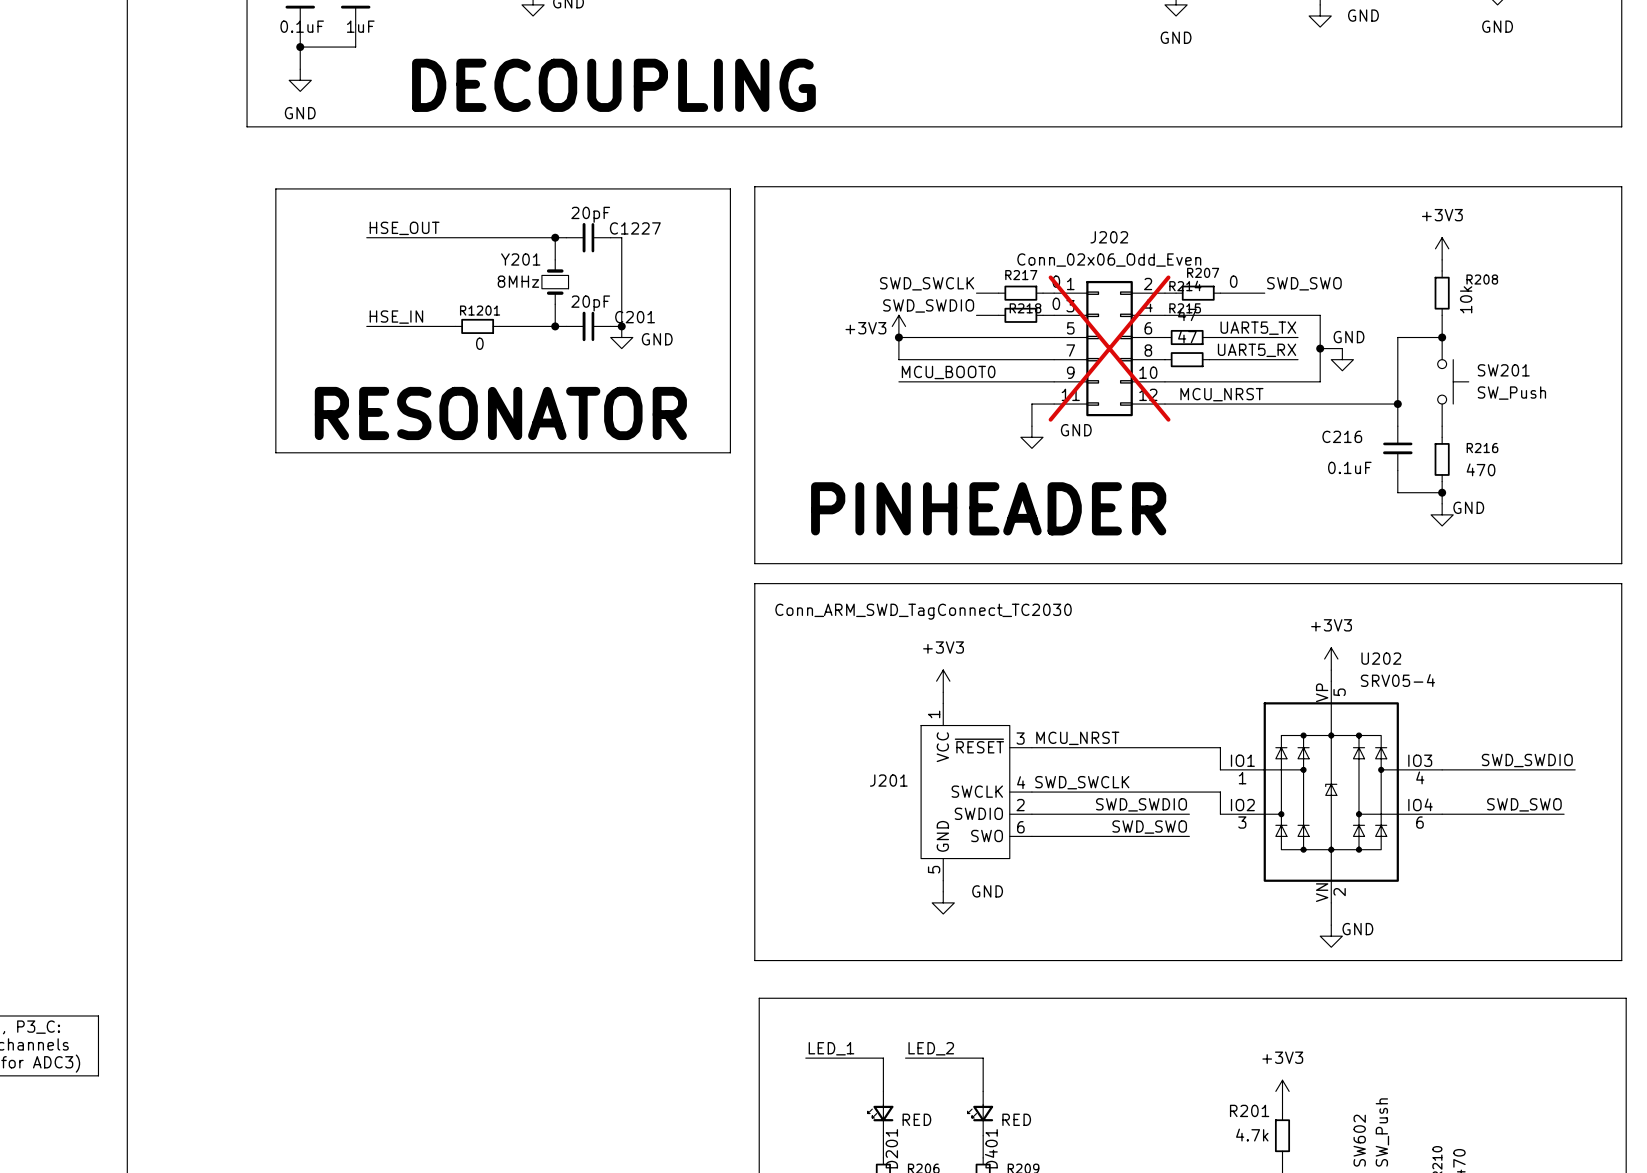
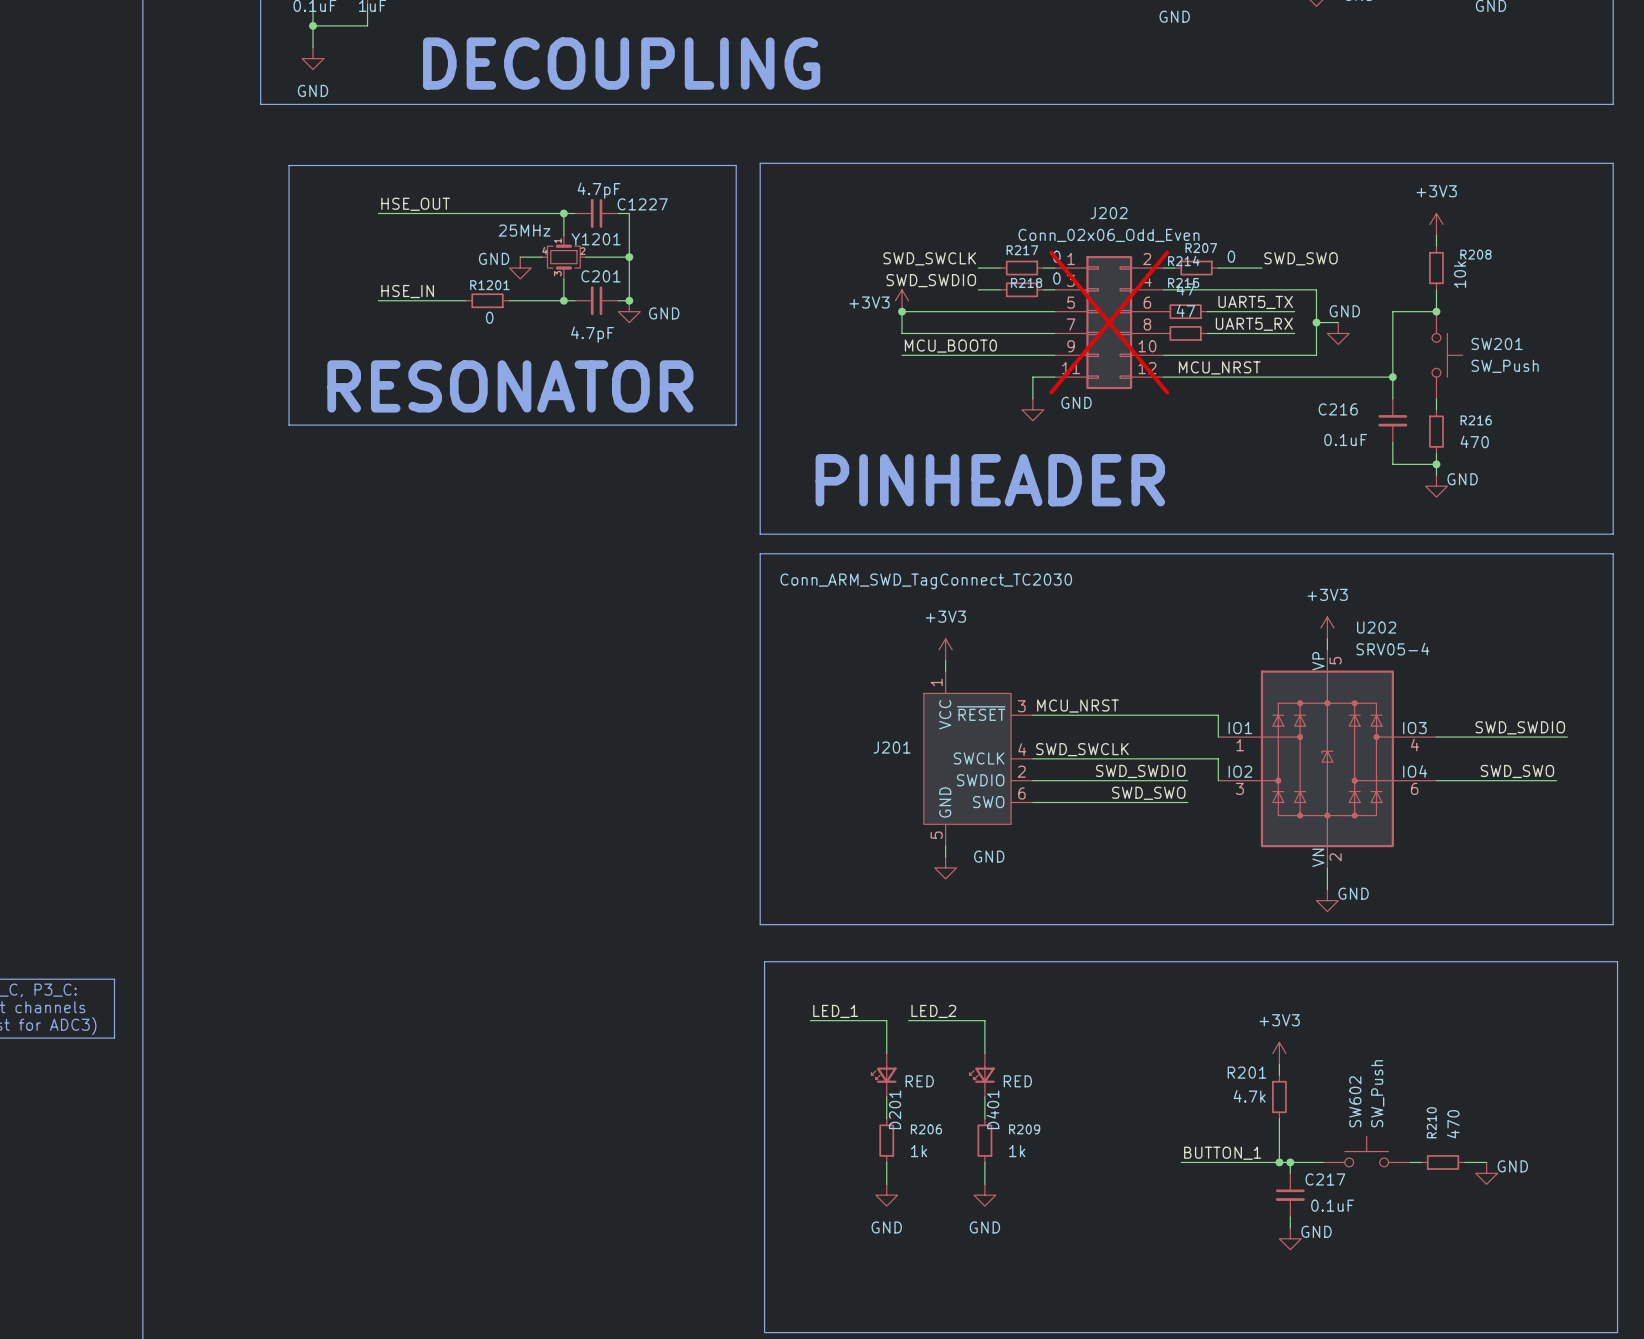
C1227 value: 20pF (590, 214) -> 4.7pF (599, 190)
Y201: 8MHz (555, 282) -> none
Y1201: none -> 25MHz (563, 257)
wire: none -> (585, 257) (629, 257)
junction: none -> (629, 257)
power symbol: none -> GND (520, 268)
C201 value: 20pF (590, 303) -> 4.7pF (592, 334)
C201 name position: C201 (635, 317) -> C201 (600, 276)

